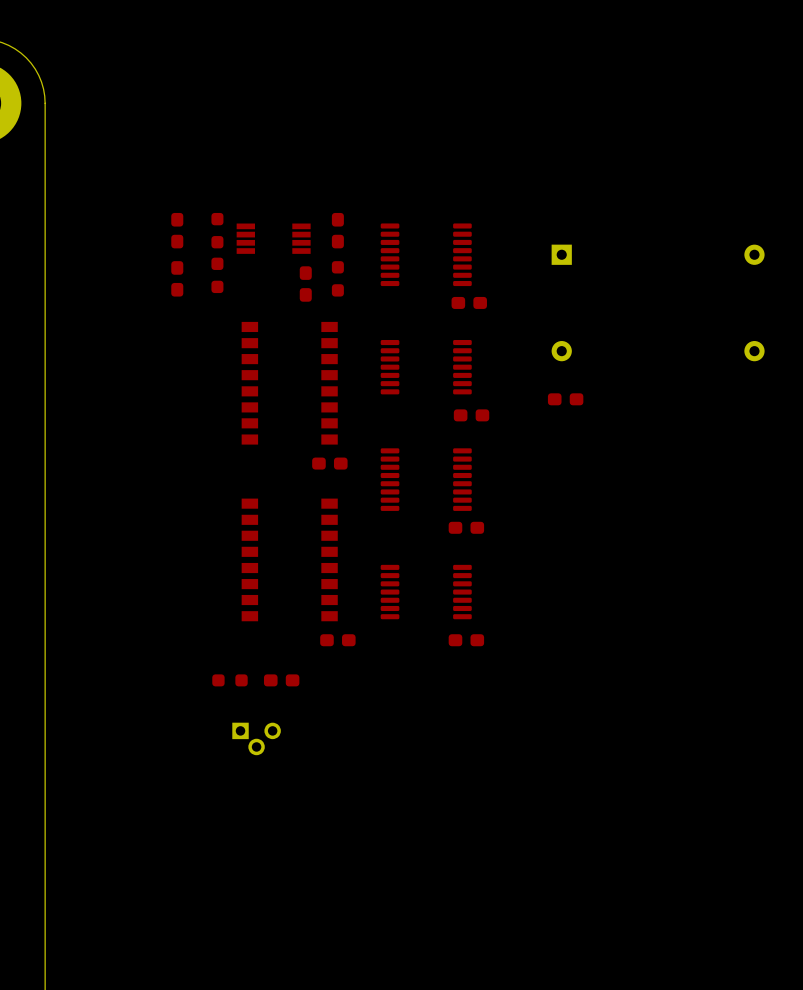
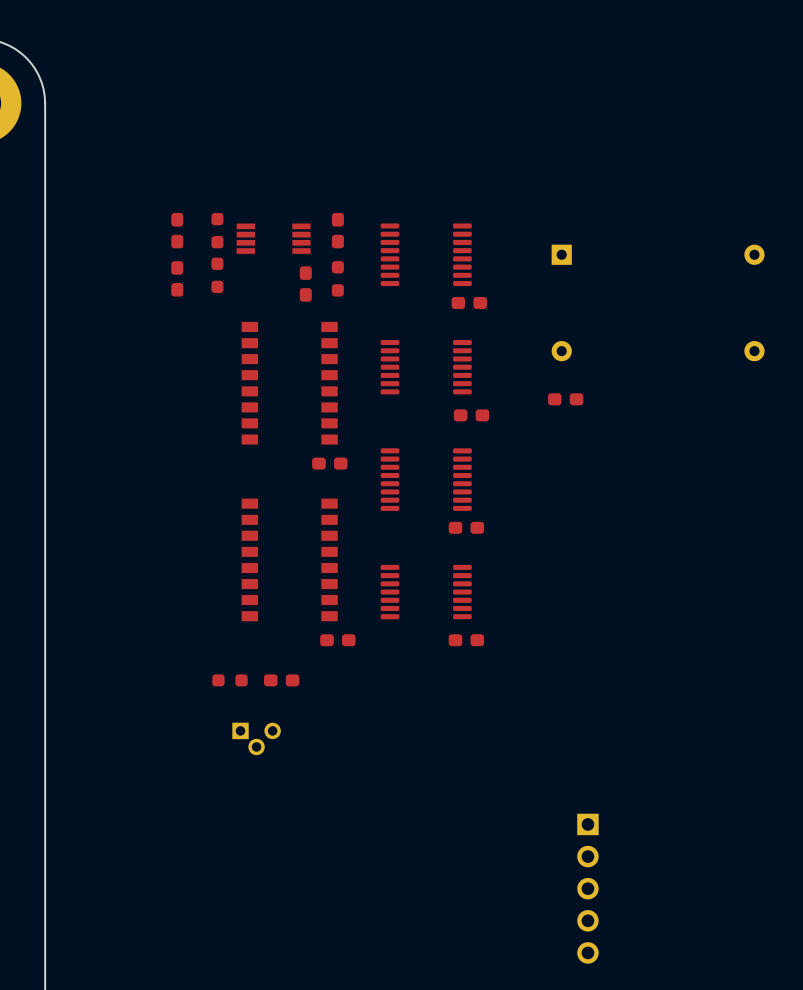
part: none -> (587, 888)

